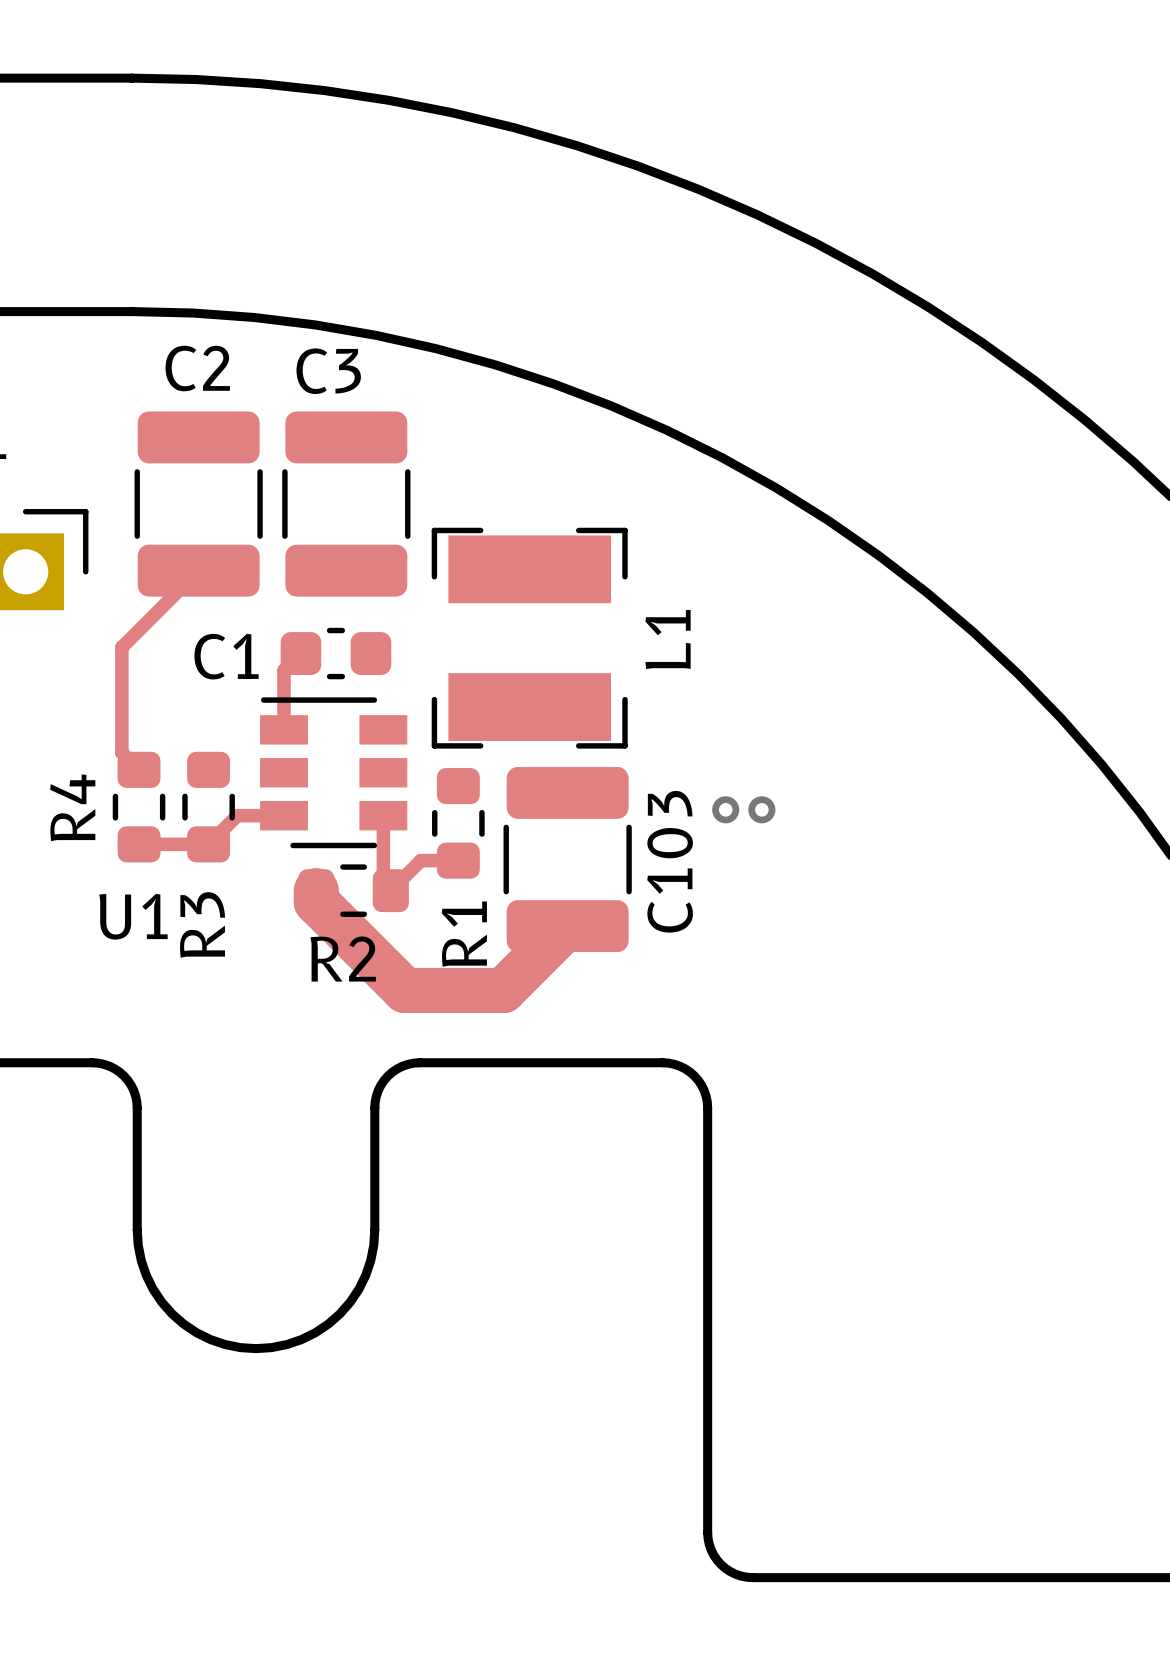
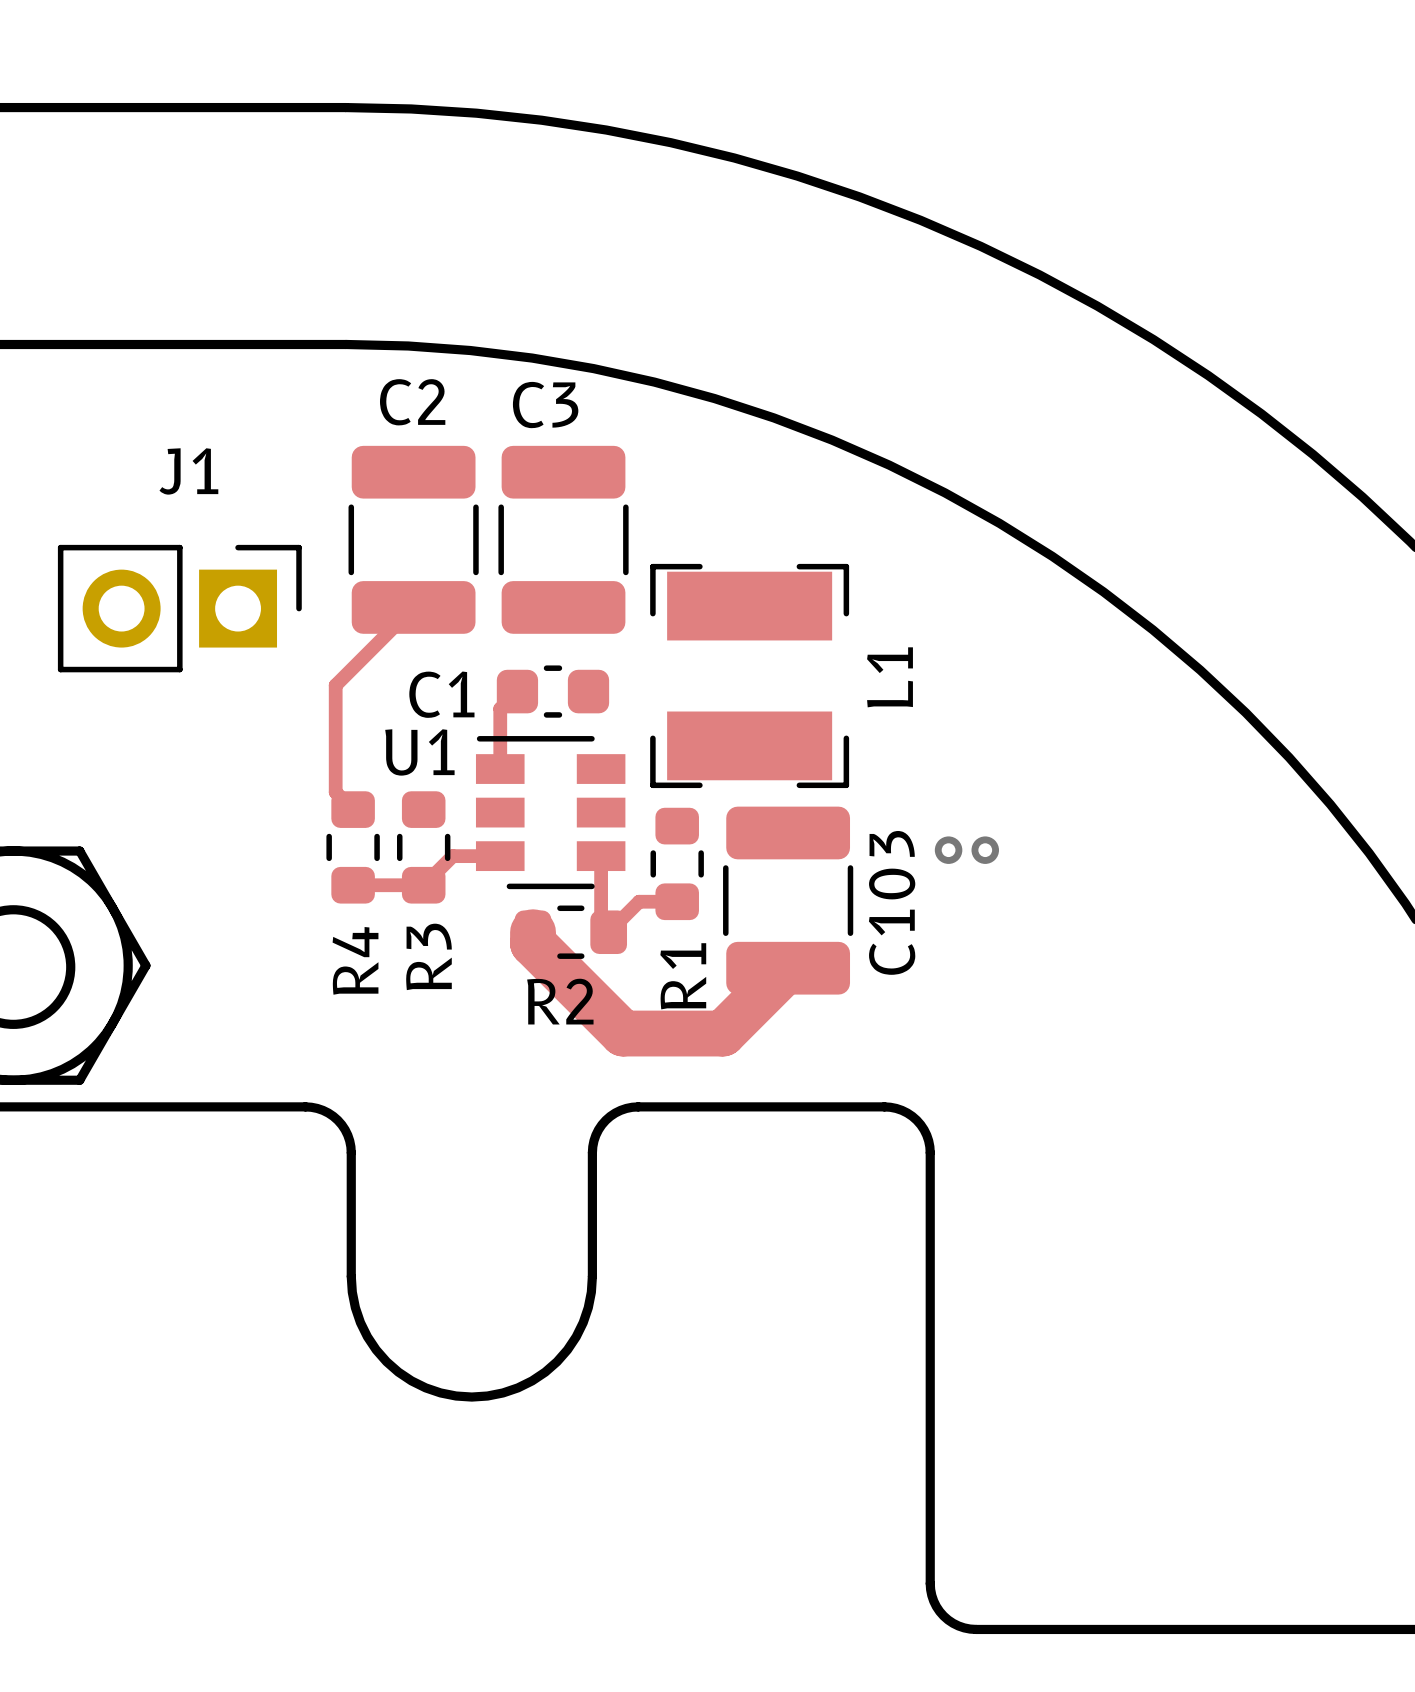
R4 name position: R4 (72, 807) -> R4 (355, 960)
U1 name position: U1 (133, 916) -> U1 (419, 752)
R3 name position: R3 (202, 924) -> R3 (428, 956)

